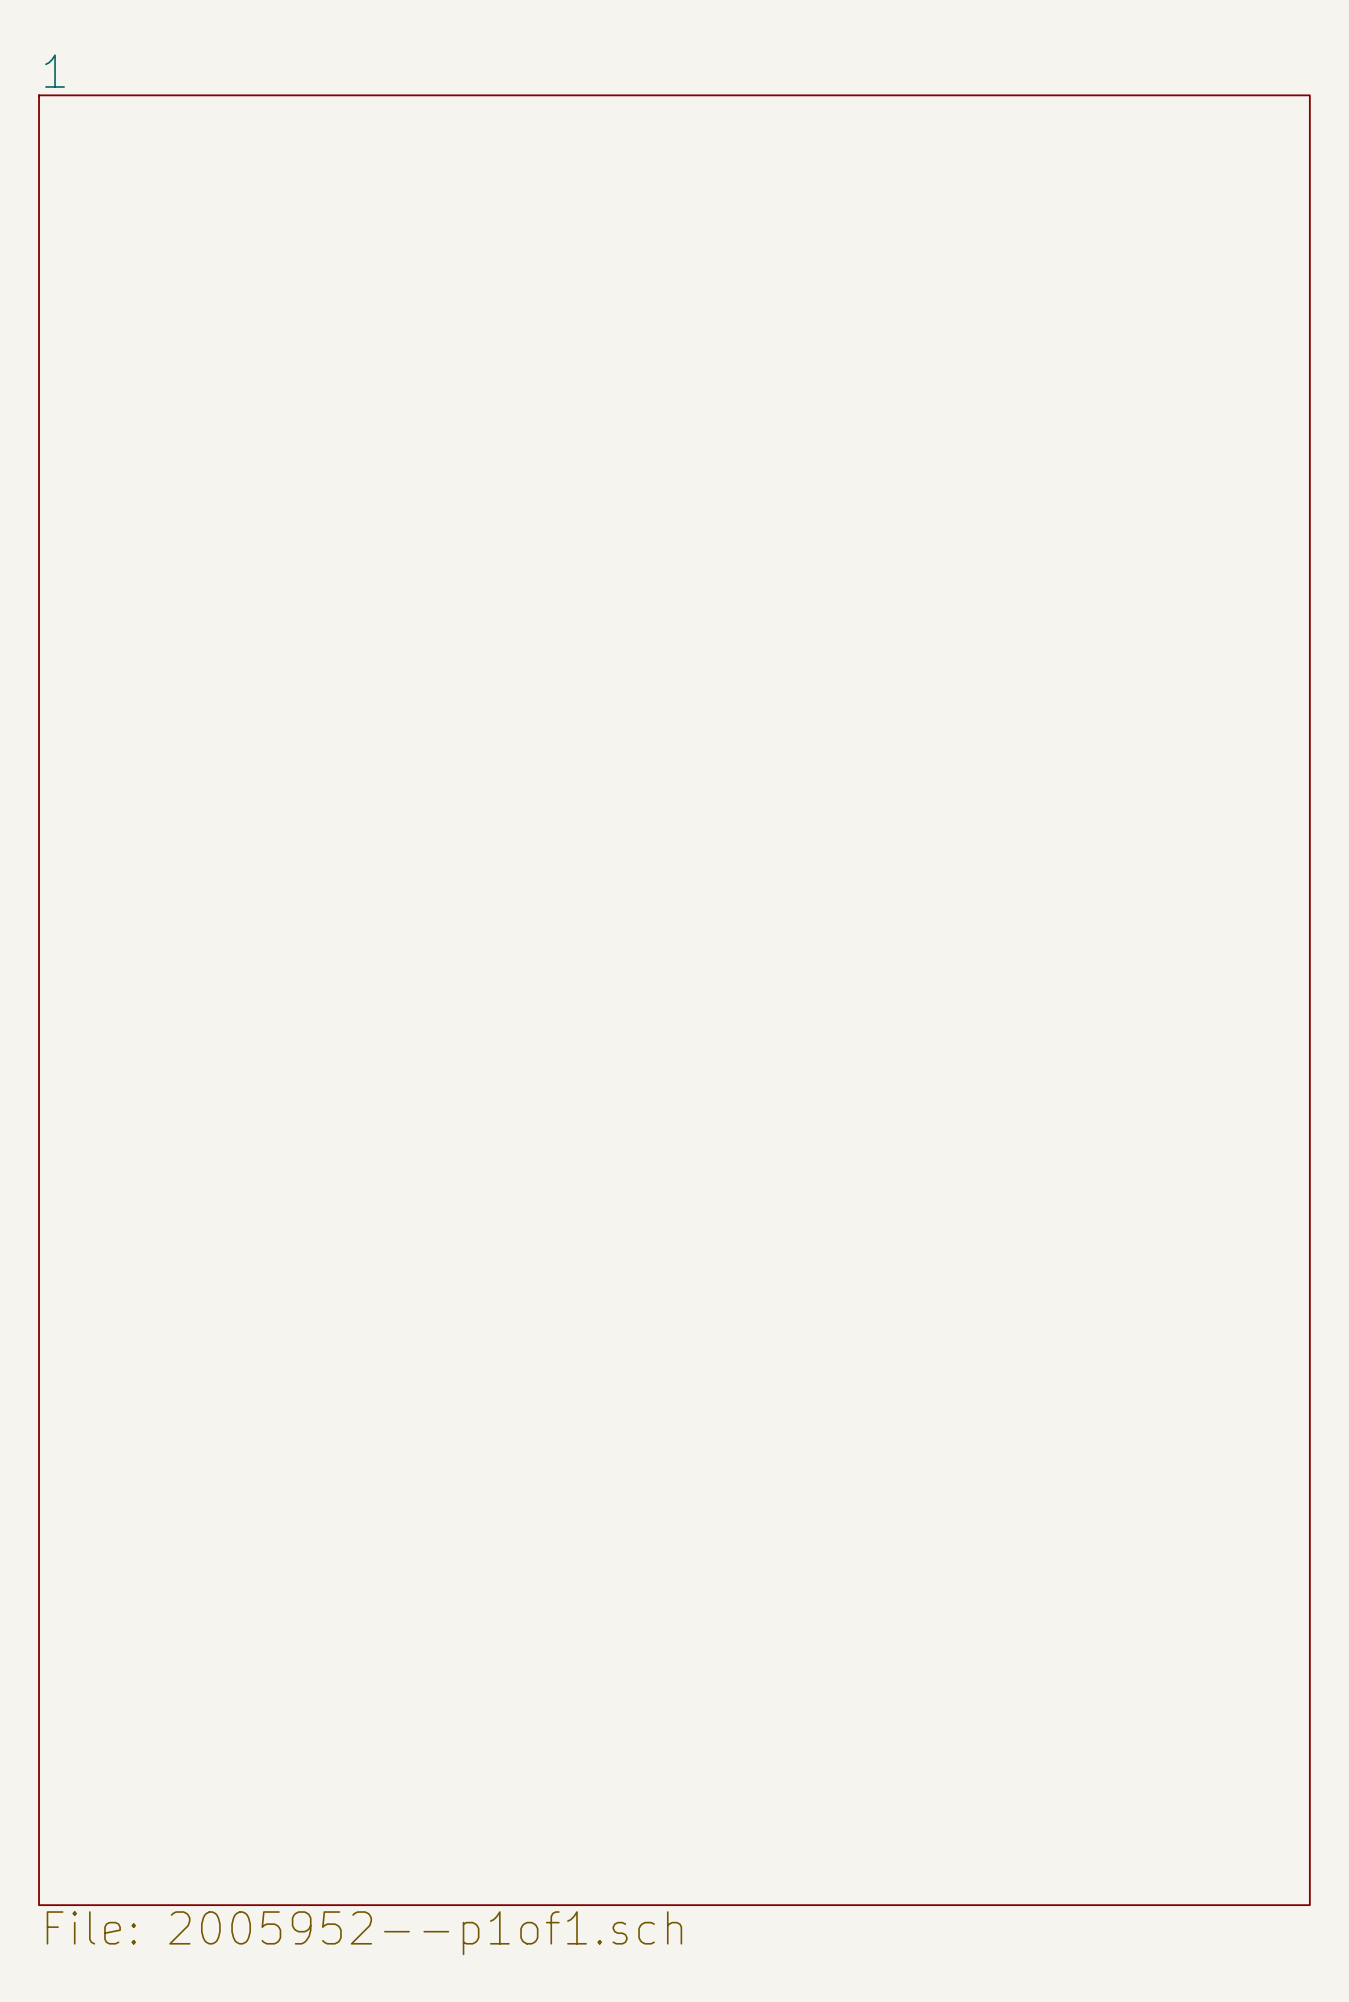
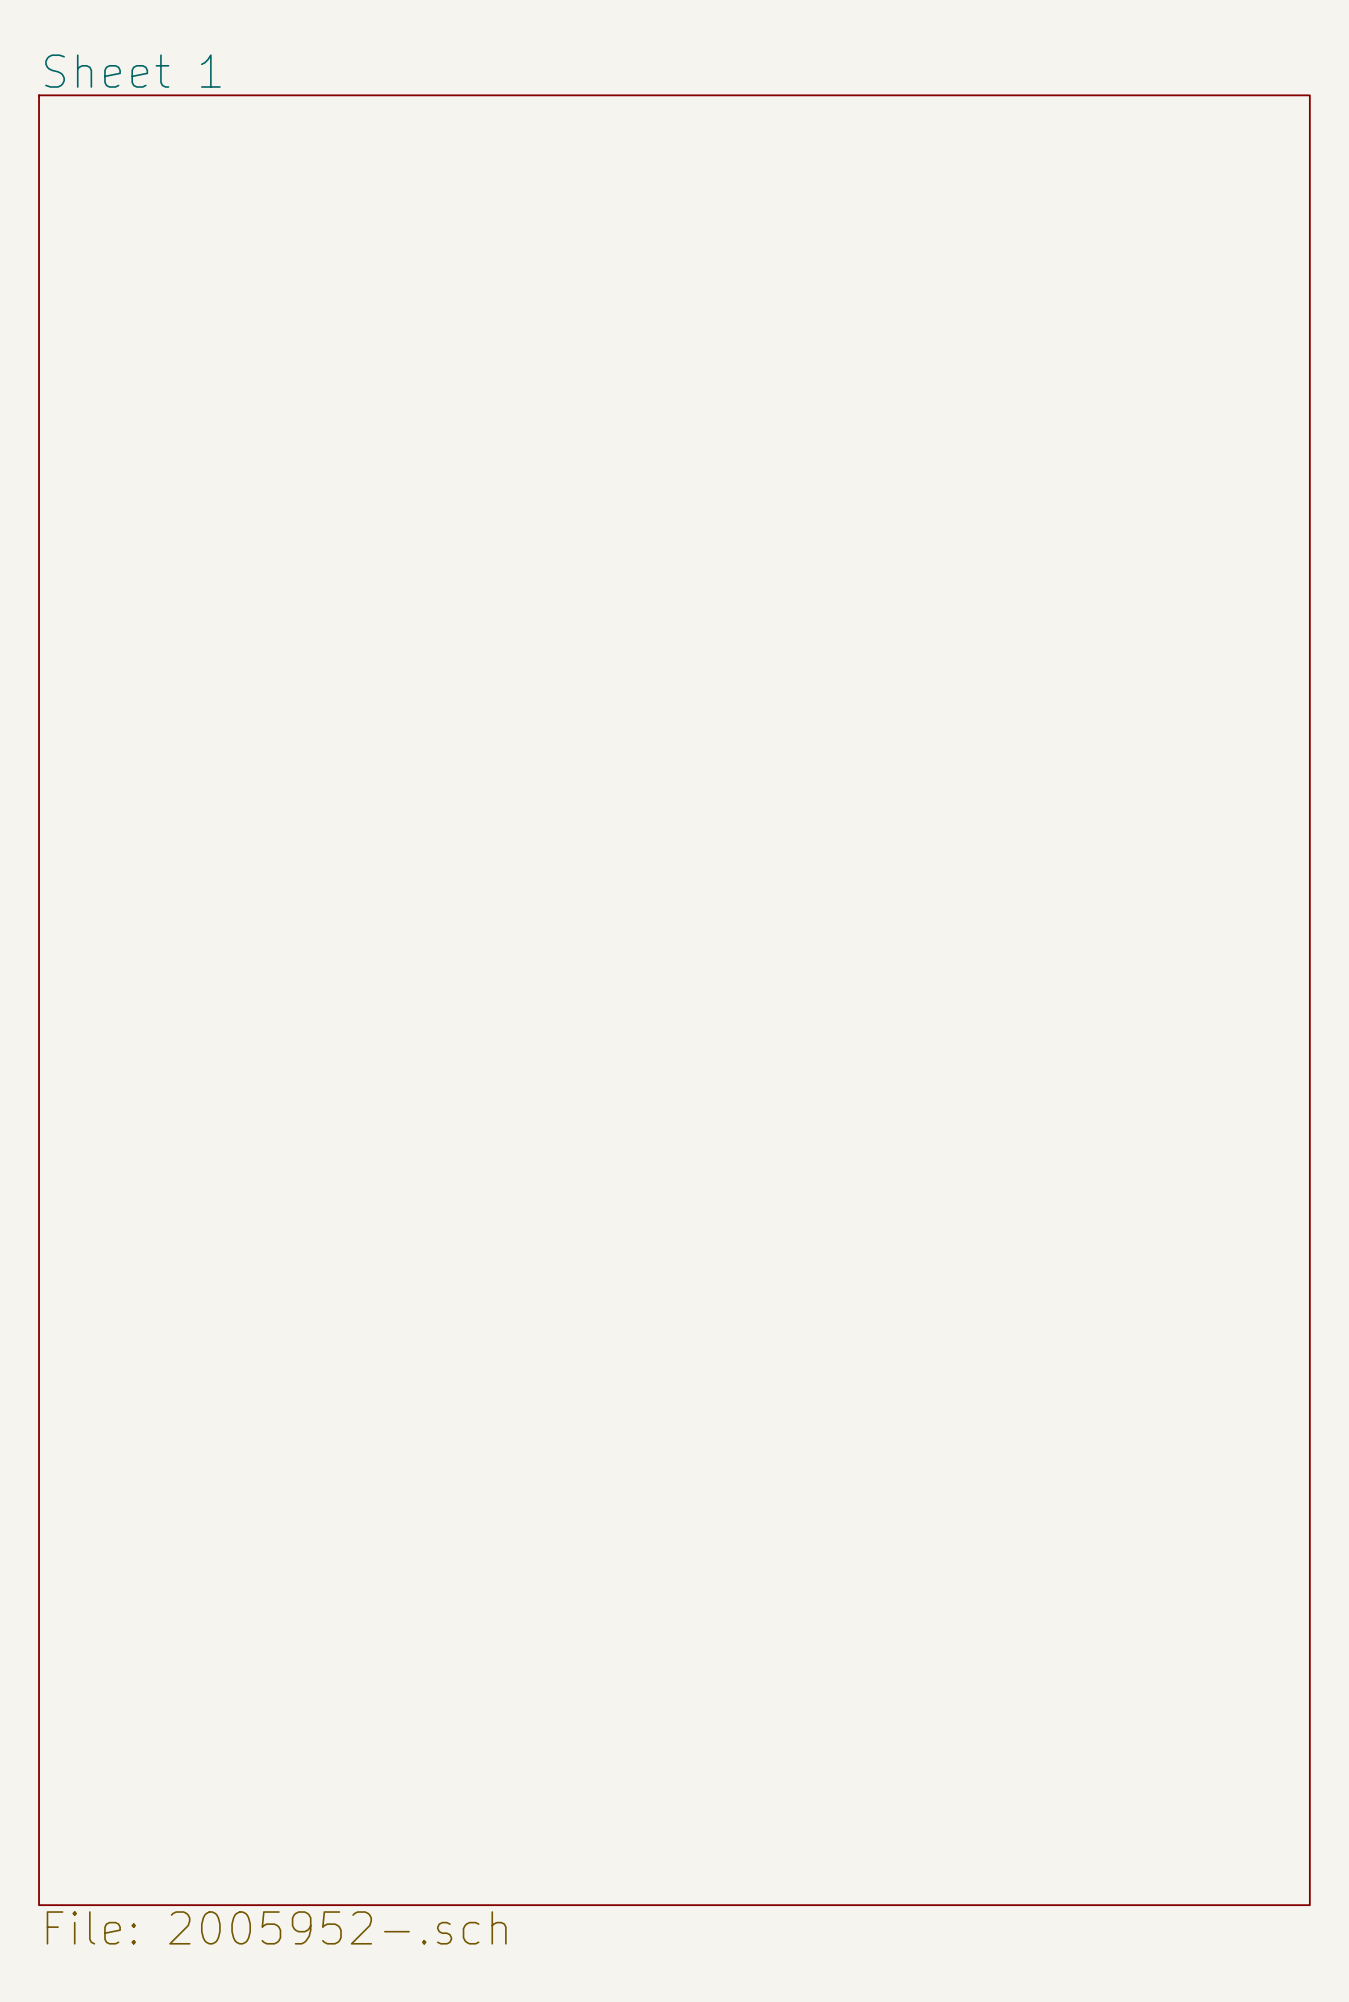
sheet 1 name: 1 (55, 71) -> Sheet 1 (132, 71)
sheet 1 value: File: 2005952--p1of1.sch (364, 1933) -> File: 2005952-.sch (276, 1927)

